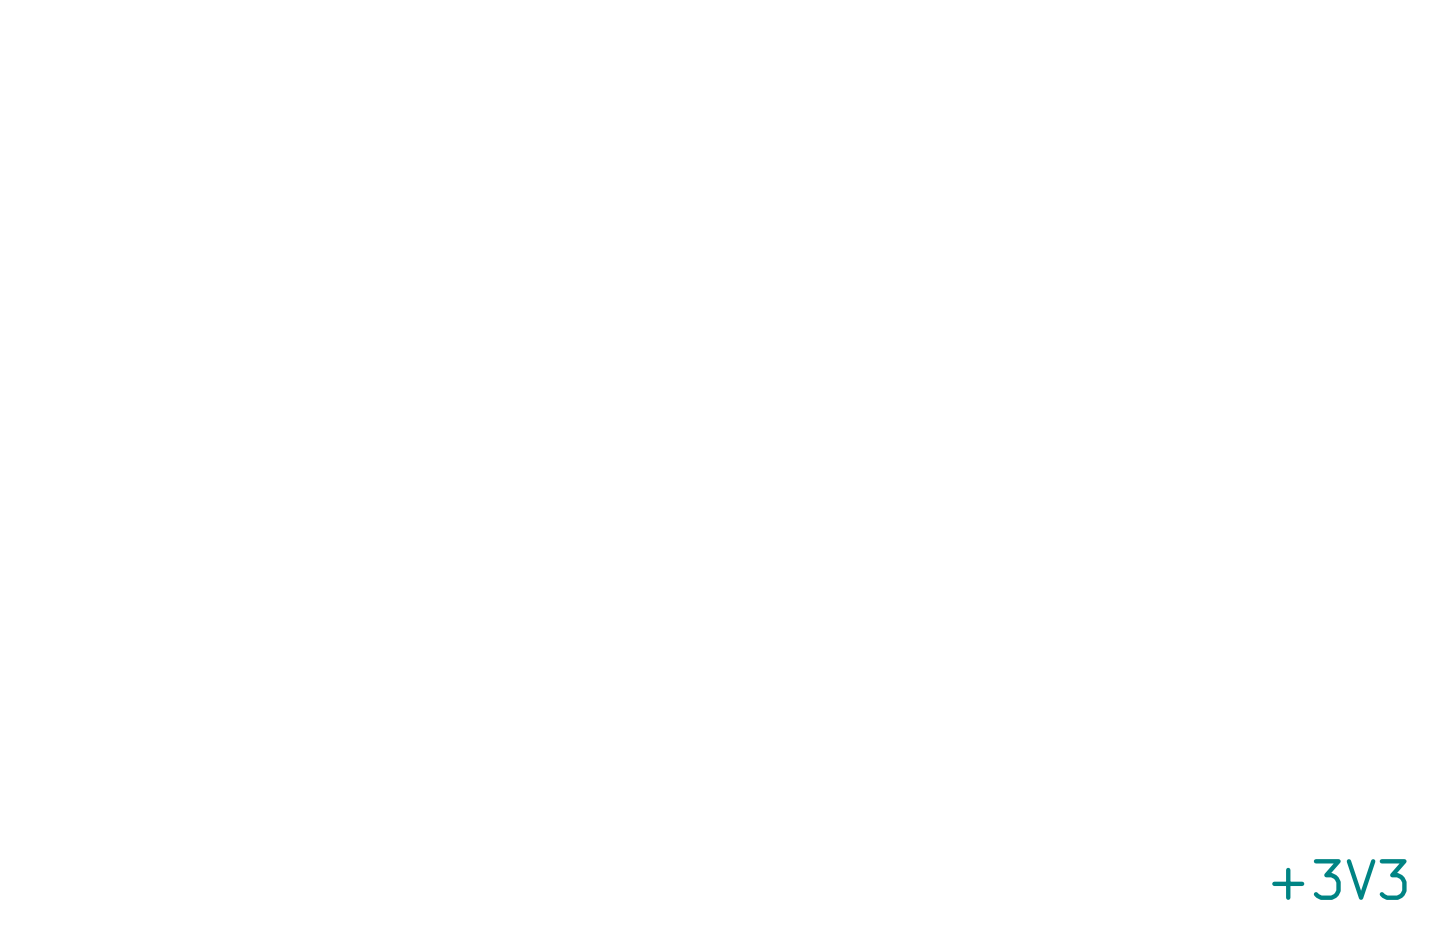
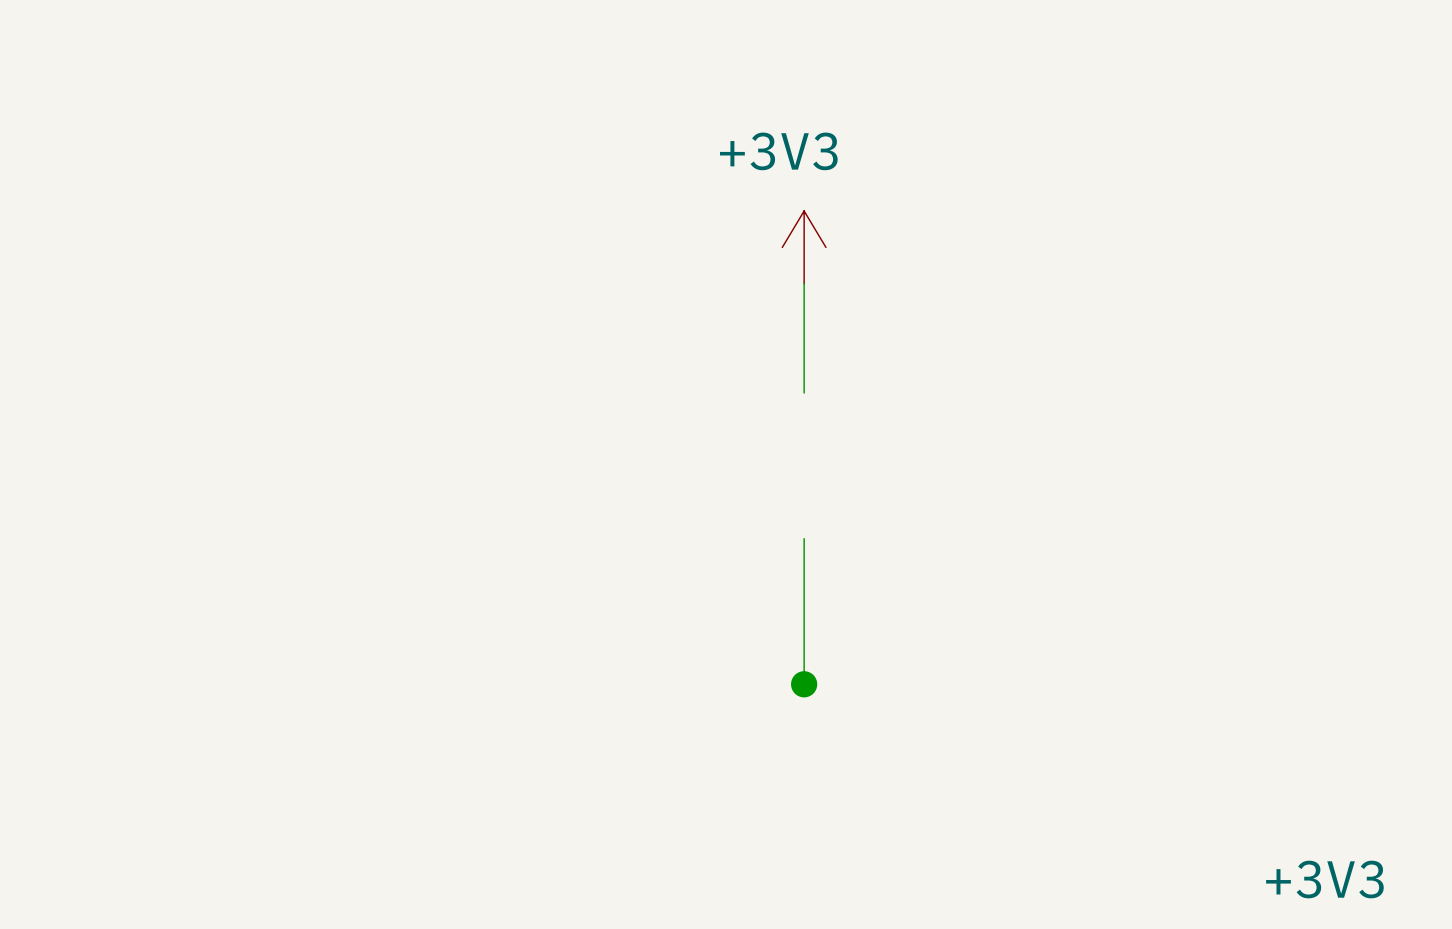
power symbol: none -> +3V3 (804, 247)
wire: none -> (804, 283) (804, 393)
wire: none -> (804, 538) (804, 684)
junction: none -> (804, 684)

